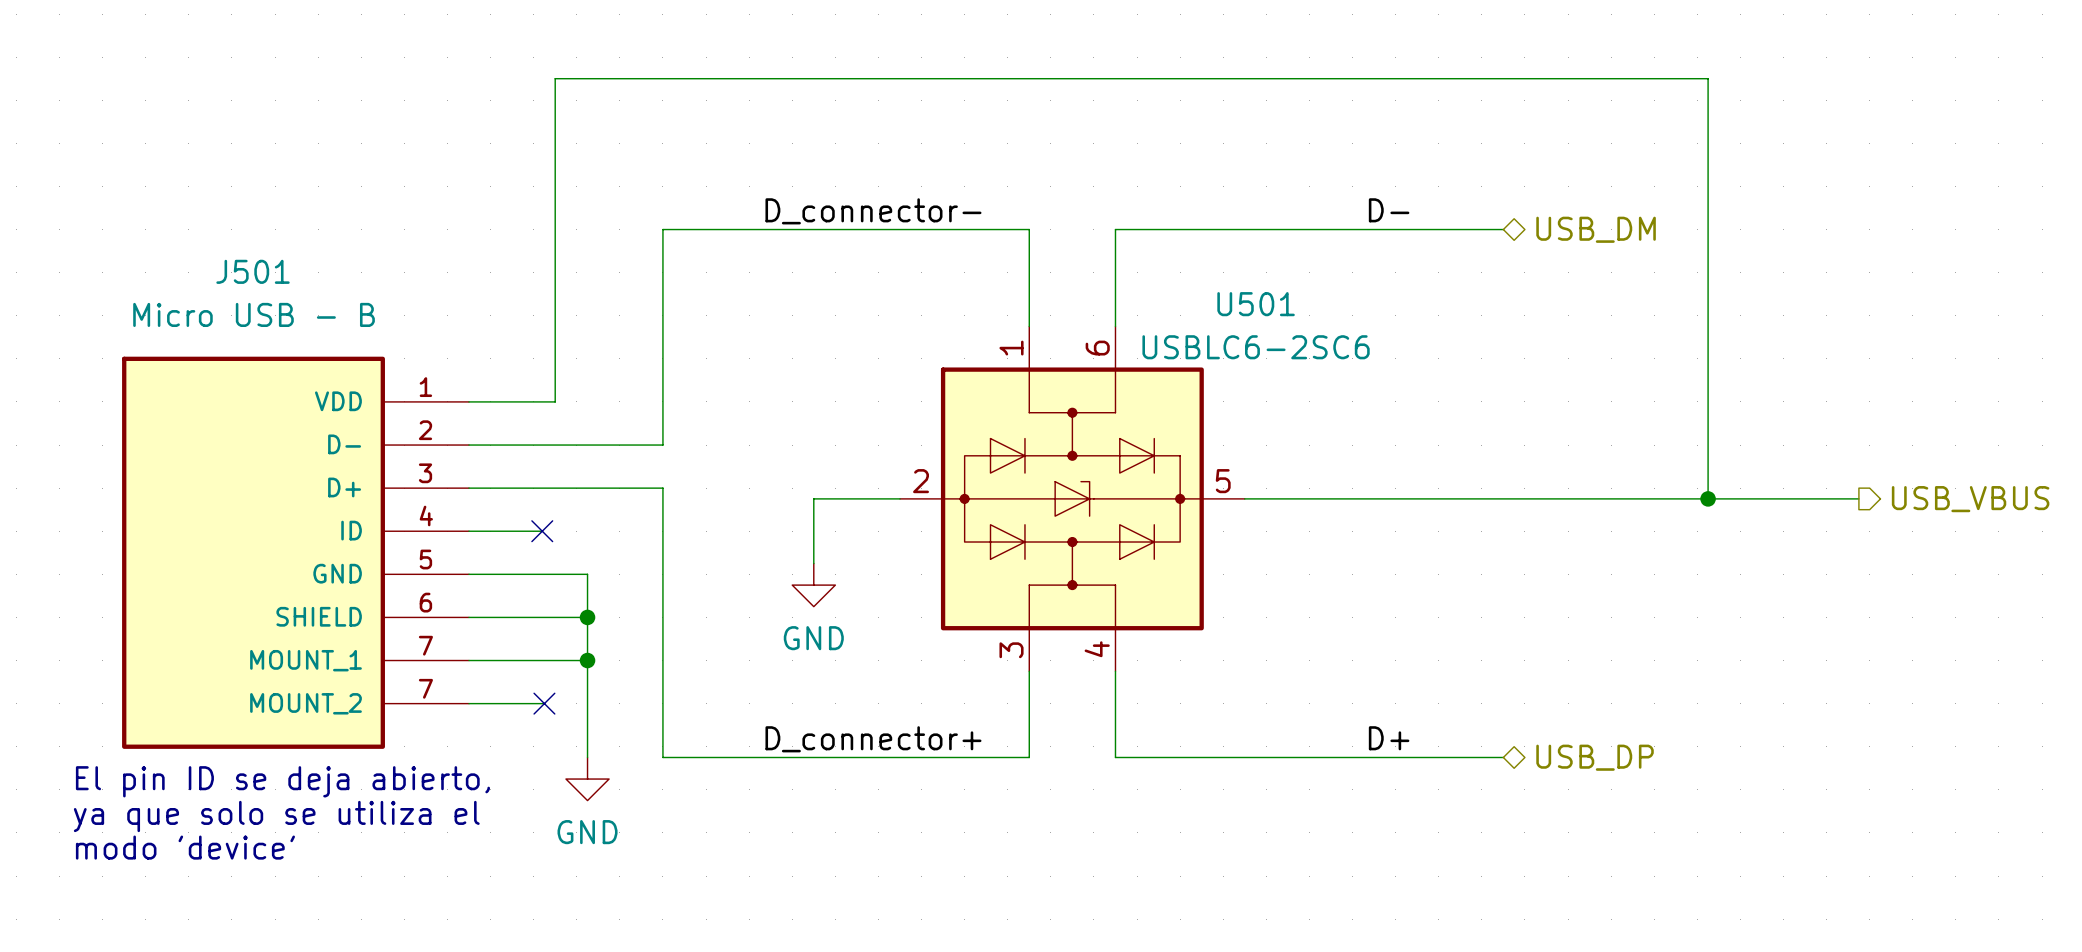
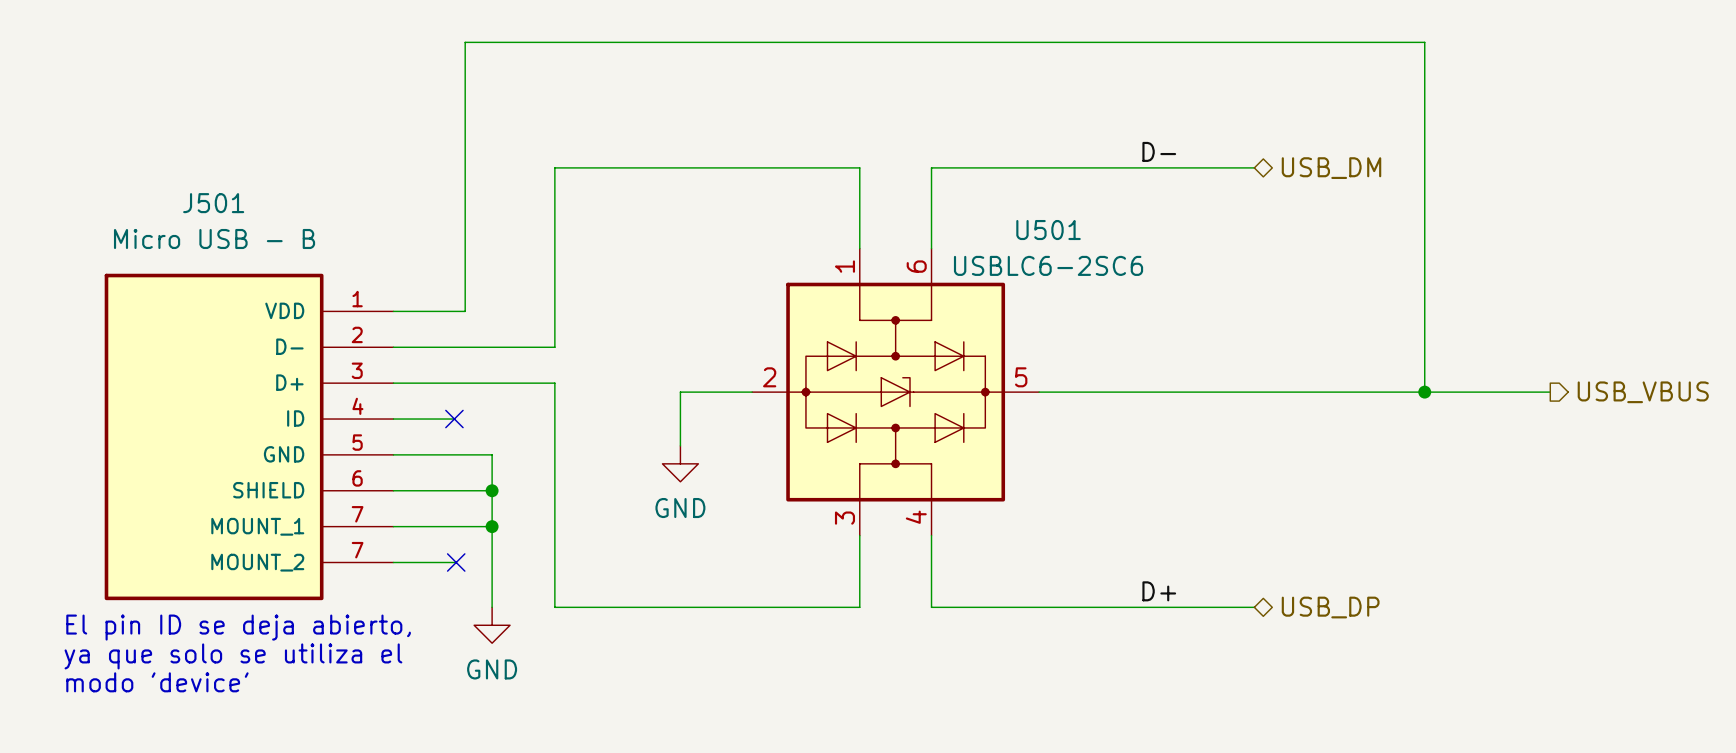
label: D_connector- (873, 211) -> none
label: D_connector+ (873, 739) -> none

